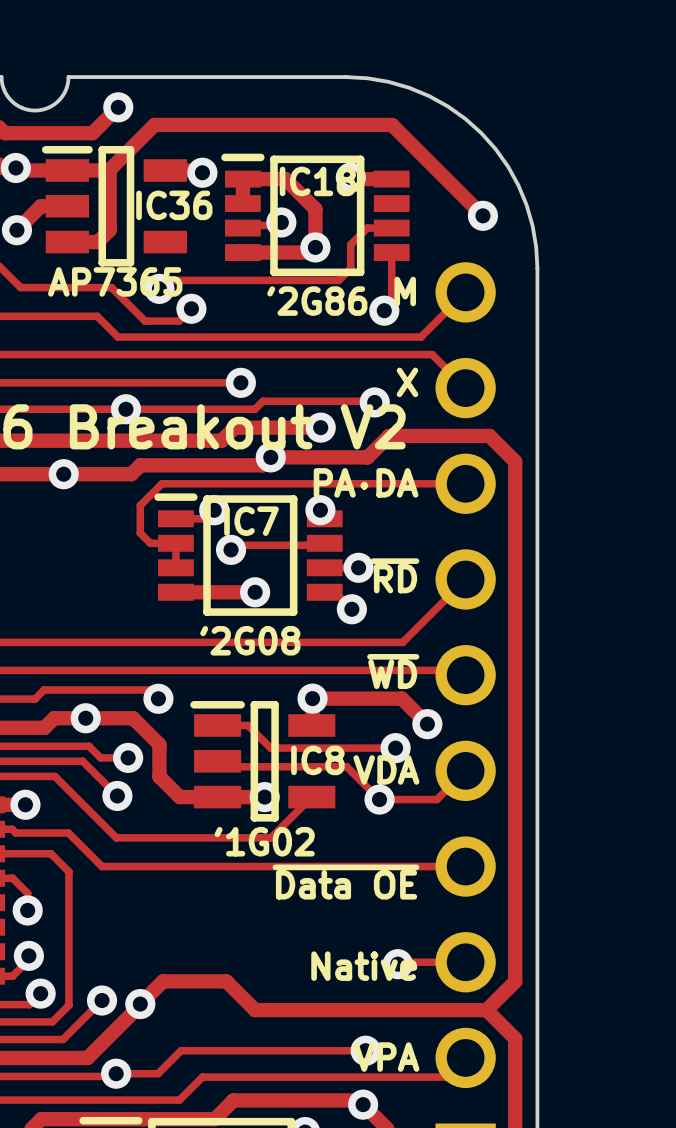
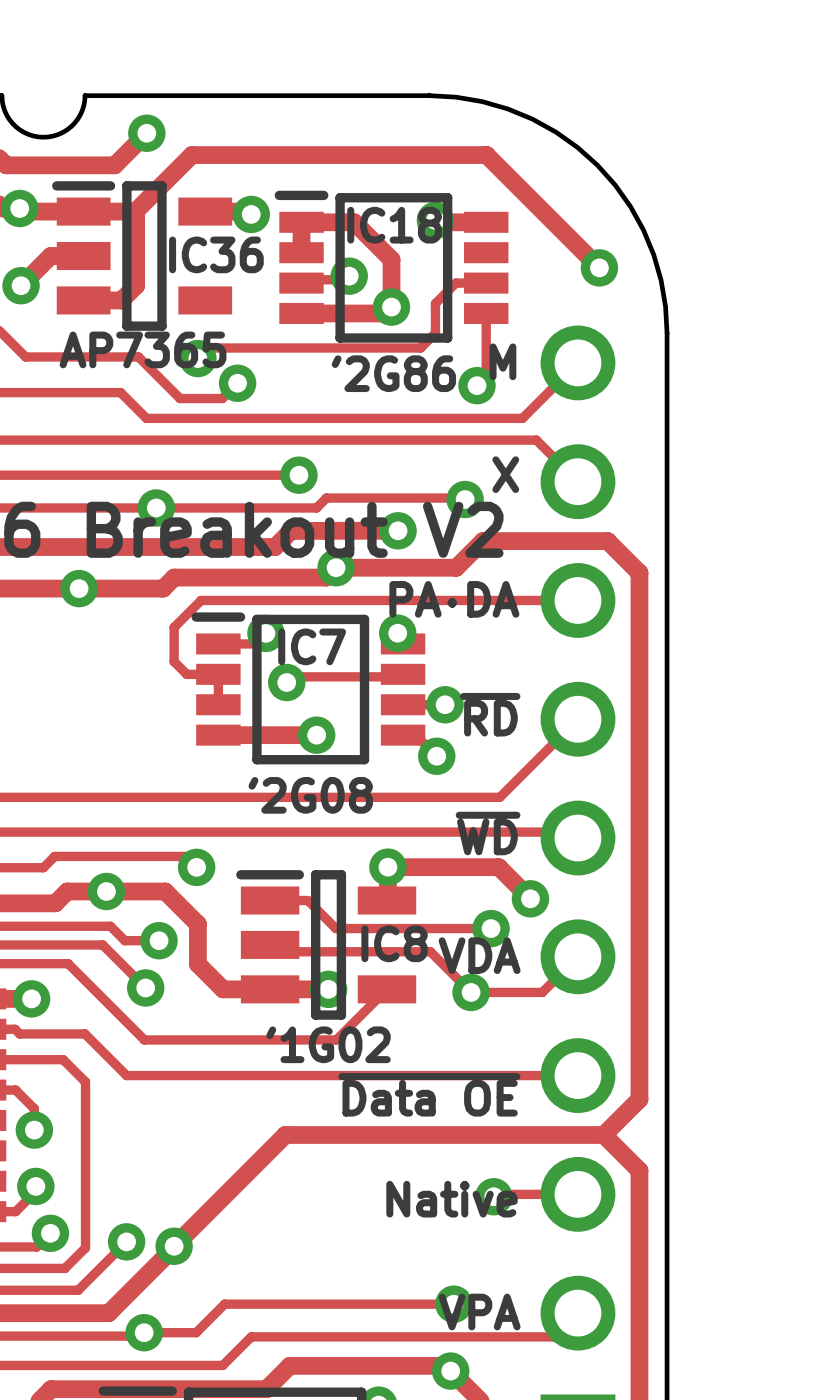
track: (515, 885) (515, 943) -> (639, 1099) (603, 1134)
track: (162, 981) (226, 981) (255, 1010) (486, 1010) -> (202, 1218) (285, 1134) (603, 1134)
track: (515, 981) (486, 1010) -> (639, 1218) (639, 1289)
track: (486, 1010) (515, 1038) -> (603, 1134) (639, 1170)

